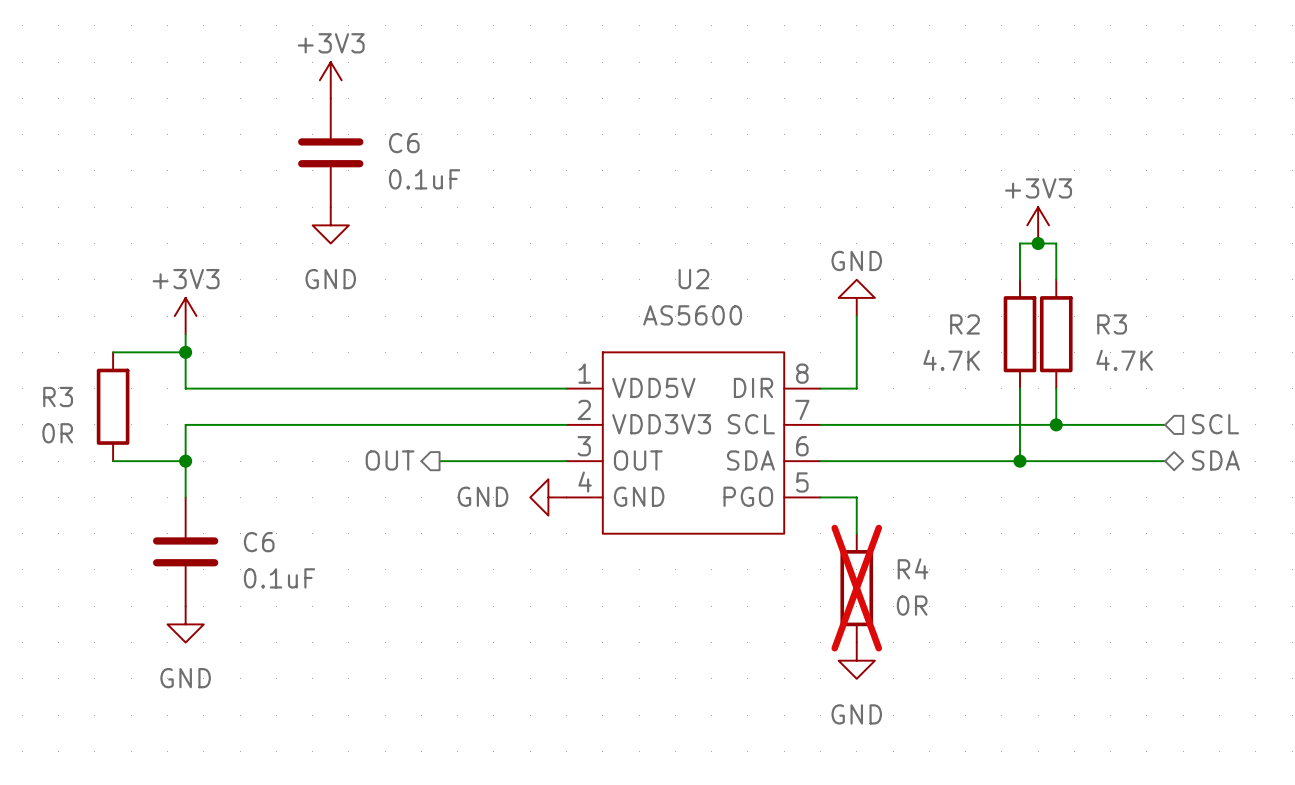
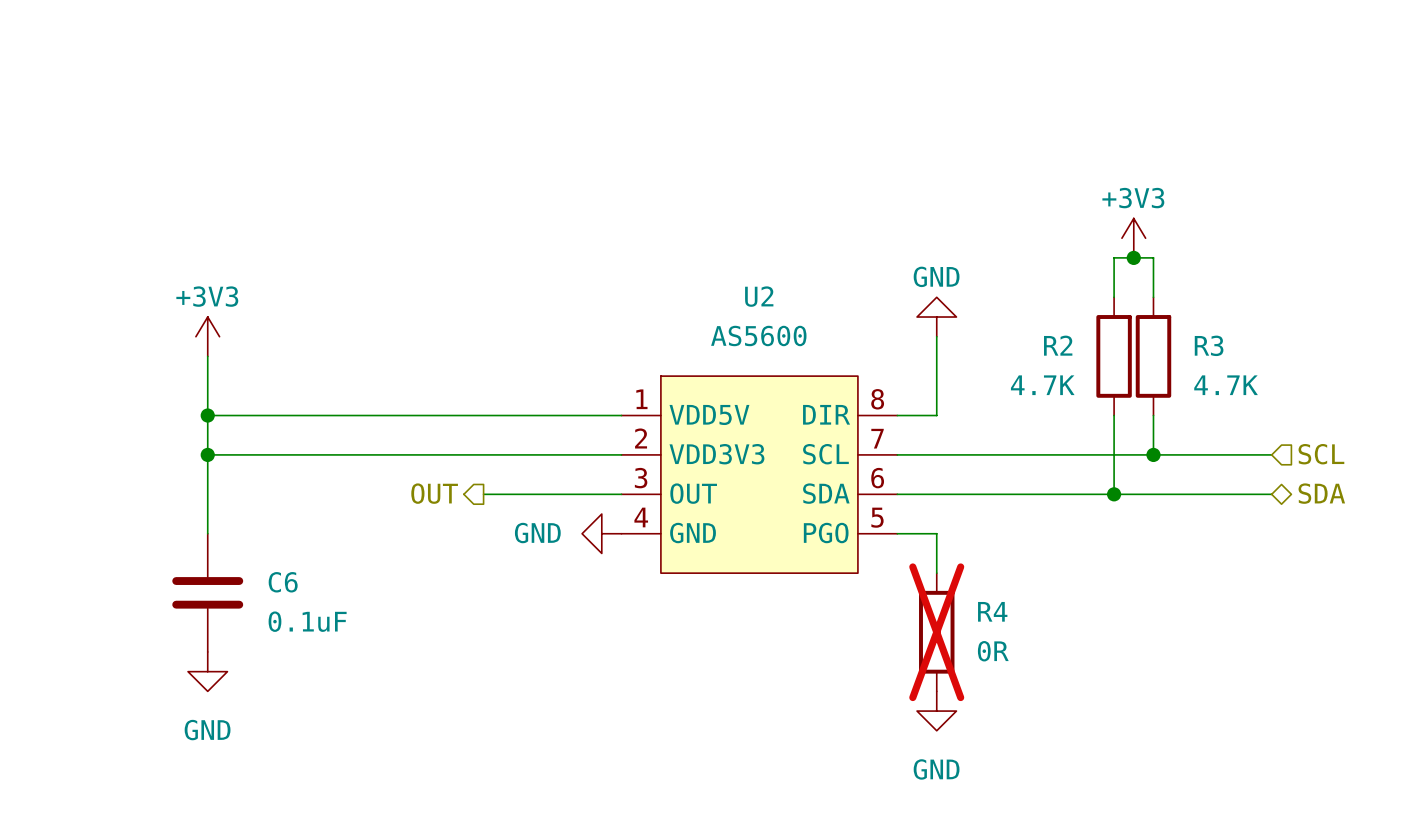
power symbol: +3V3 (330, 80) -> none
C6: 0.1uF (330, 152) -> none
power symbol: GND (330, 225) -> none
wire: (113, 352) (185, 352) -> none
junction: (185, 352) -> none
wire: none -> (207, 415) (207, 454)
junction: none -> (207, 415)
R3: 0R (113, 406) -> none
junction: none -> (207, 454)
wire: (113, 461) (185, 461) -> none
junction: (185, 461) -> none

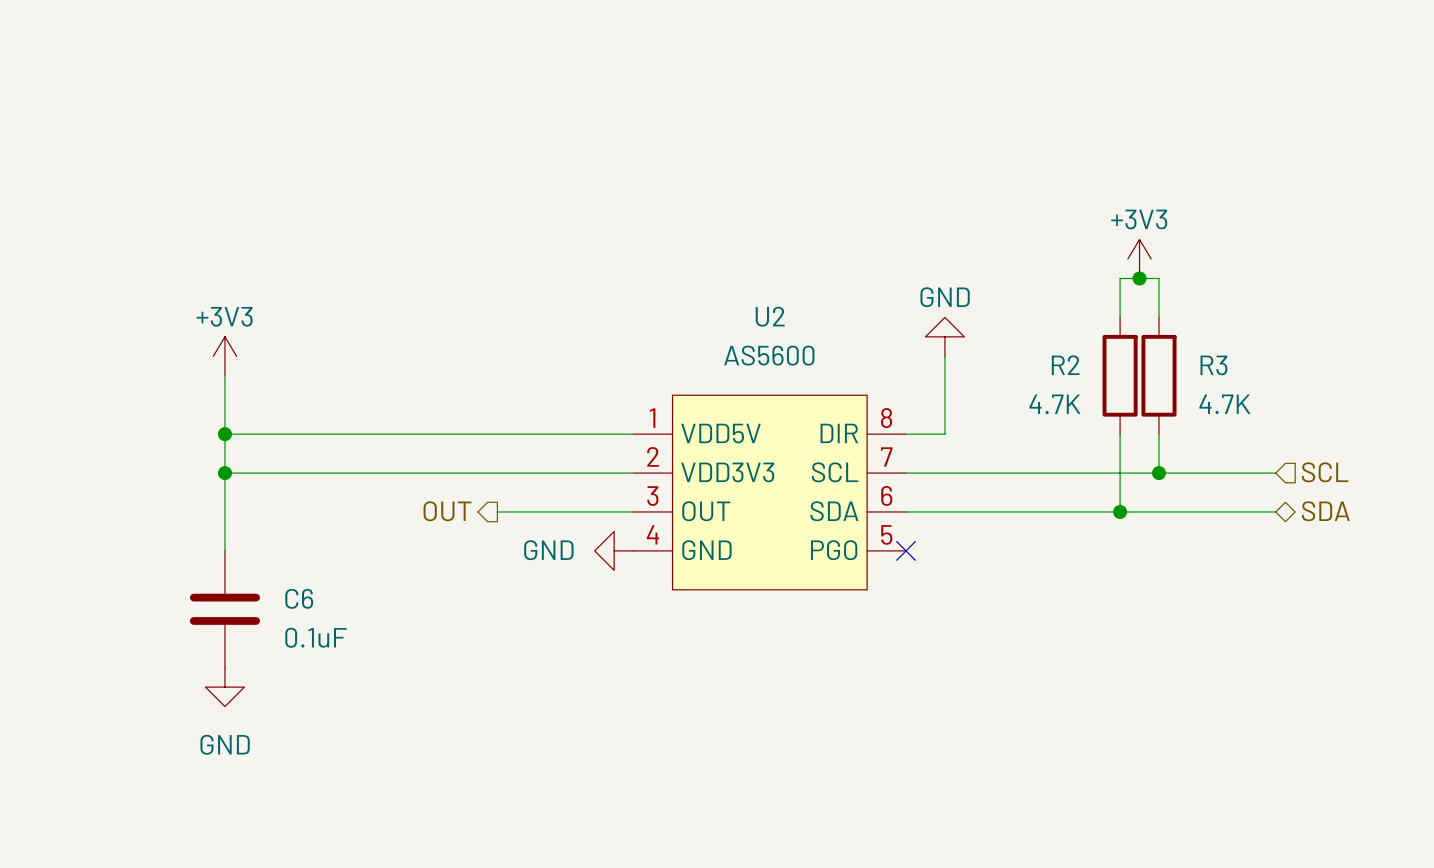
wire: (897, 533) (936, 533) (936, 573) -> none
no-connect mark: none -> (906, 550)
R4: 0R (936, 632) -> none
power symbol: GND (936, 711) -> none

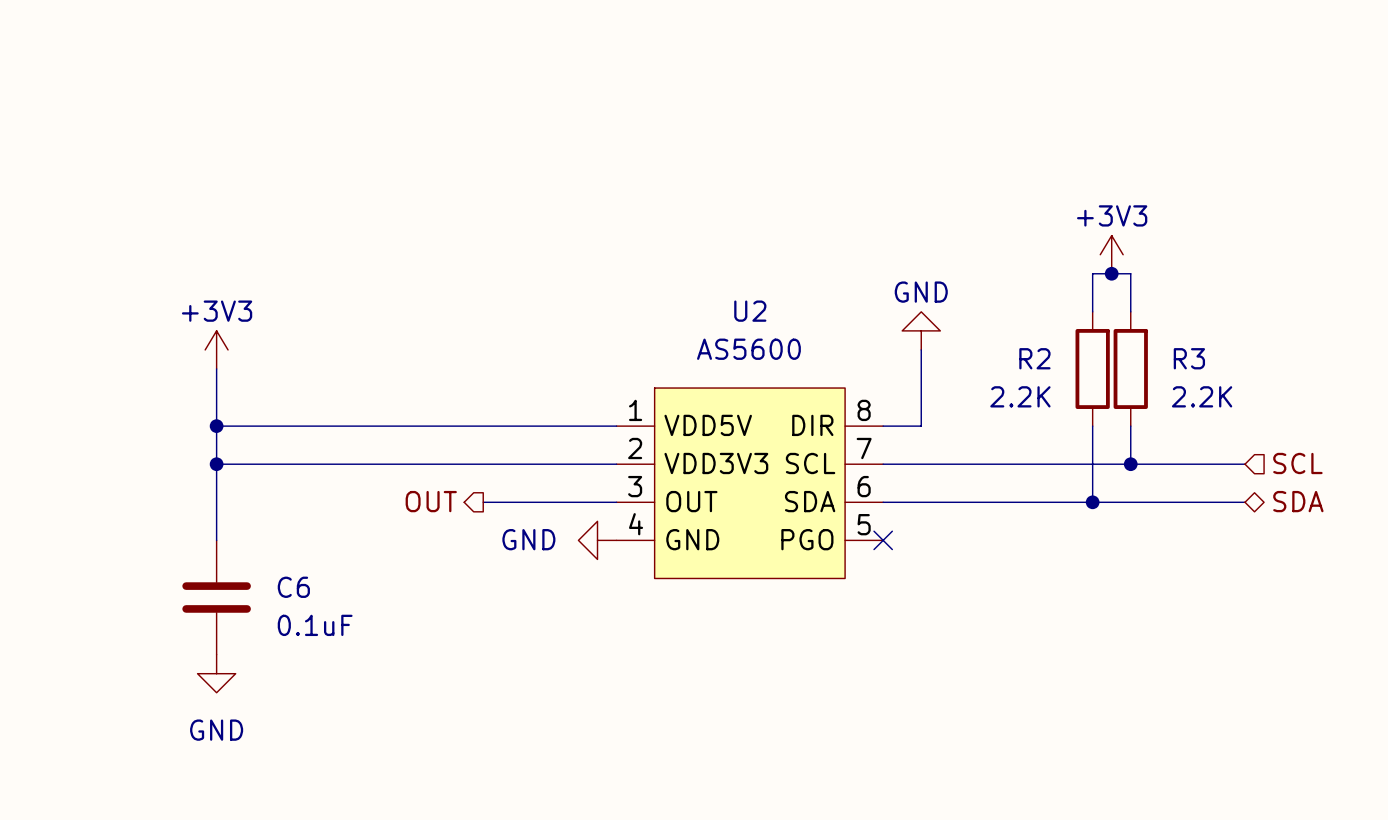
R2 value: 4.7K (1054, 404) -> 2.2K (1020, 396)
R3 value: 4.7K (1224, 404) -> 2.2K (1202, 396)

